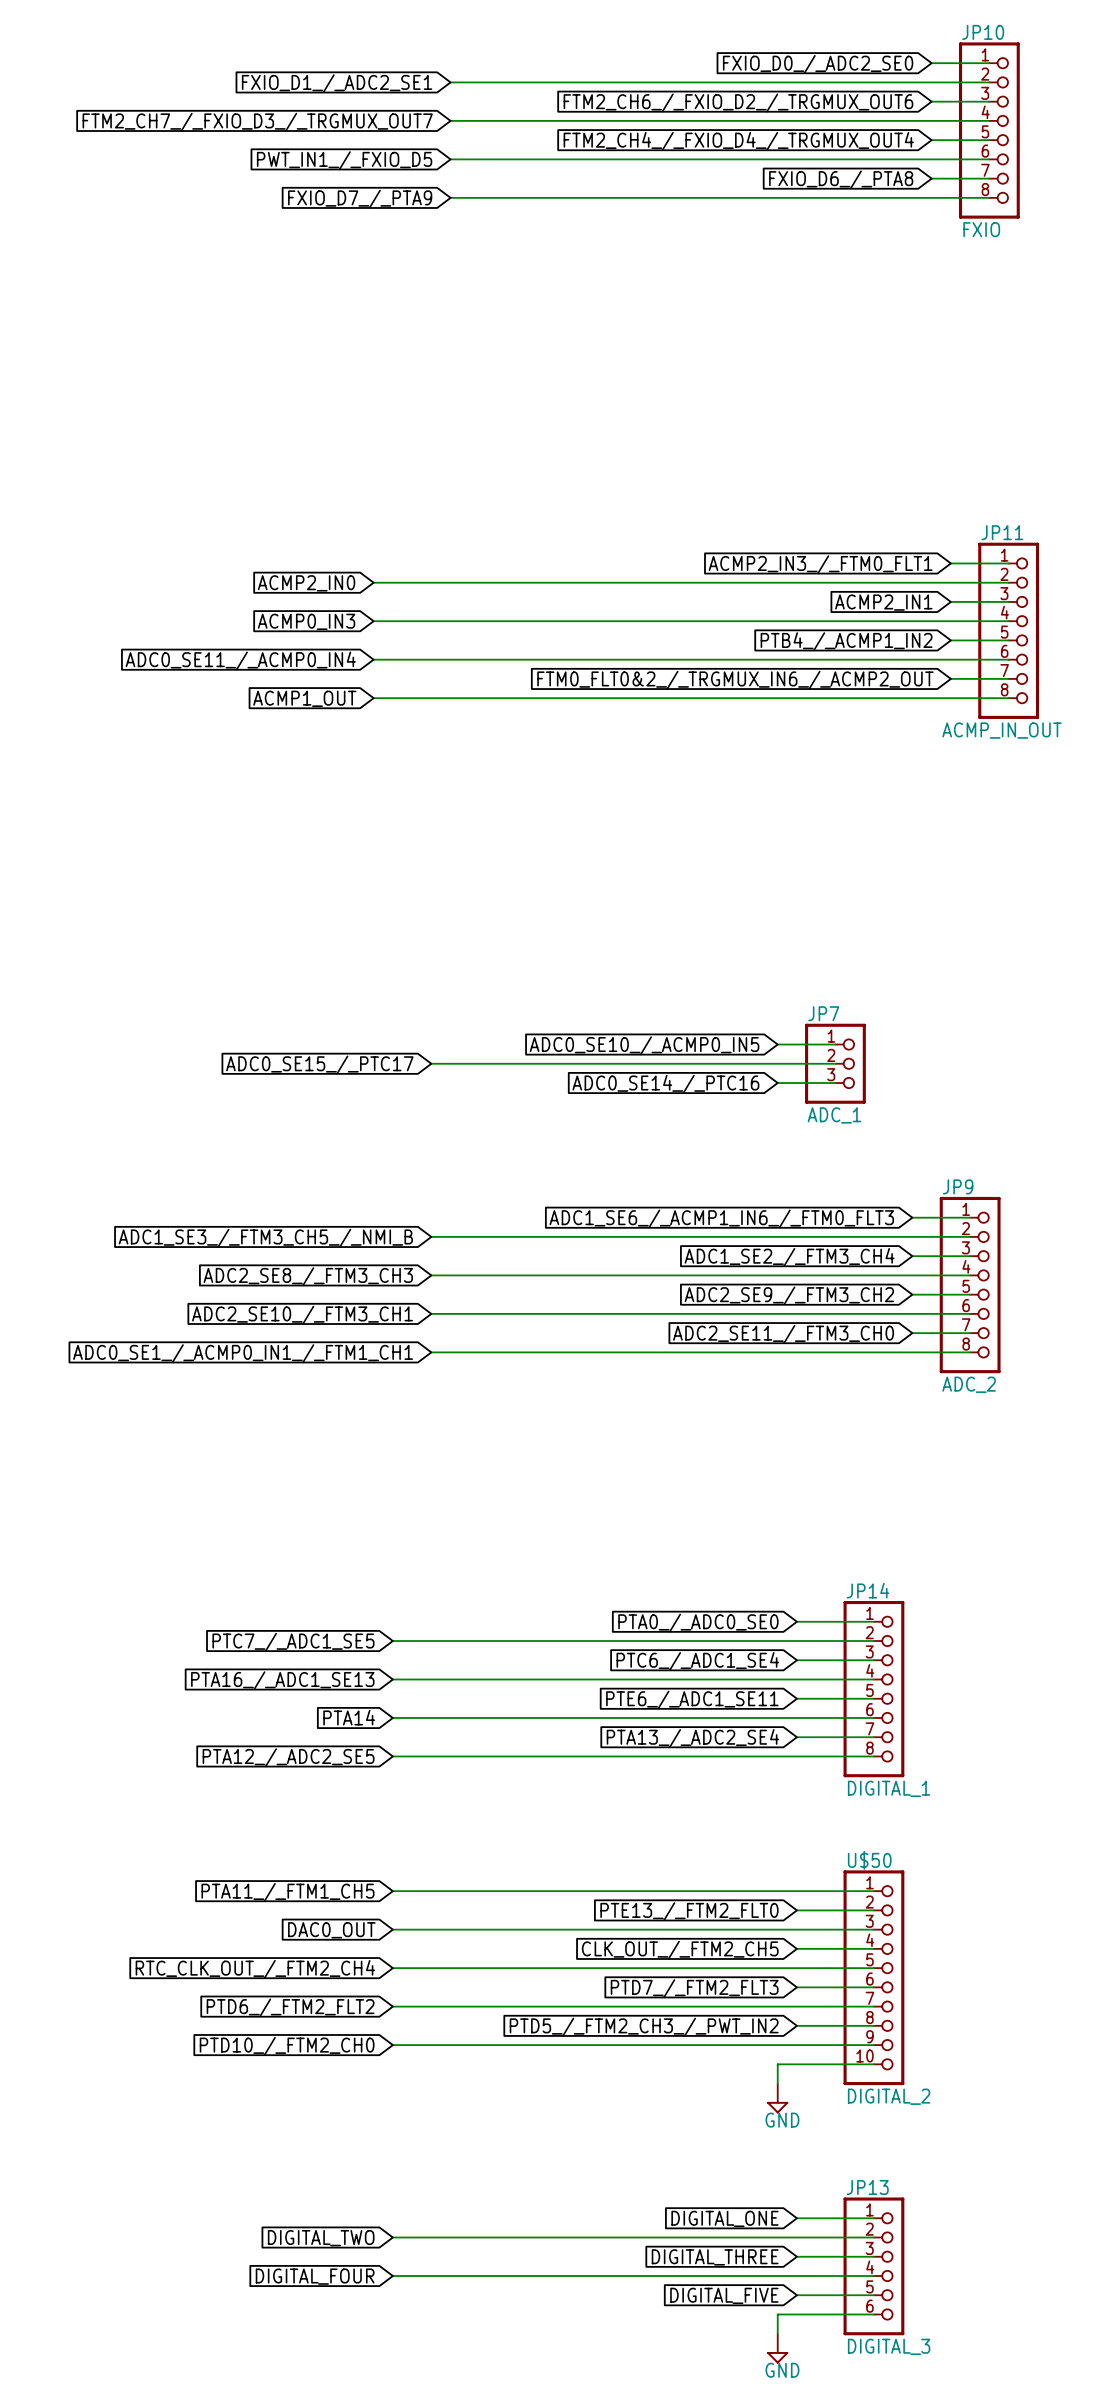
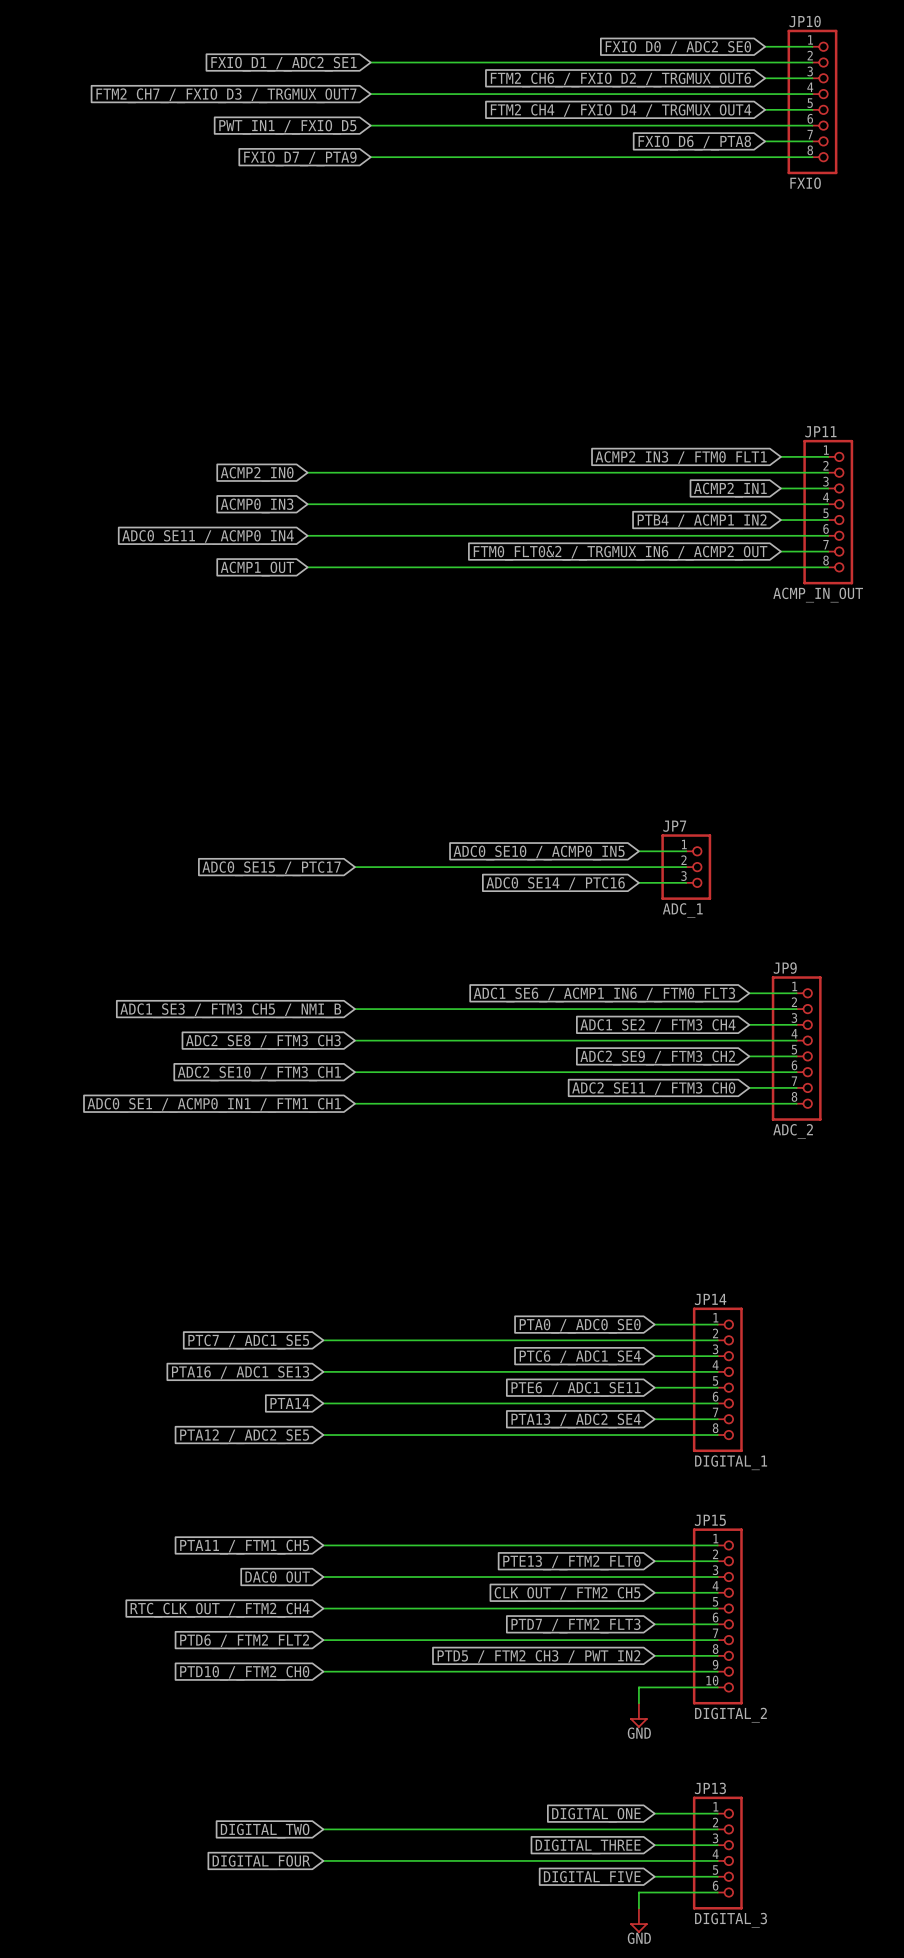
U$50 name: U$50 (869, 1860) -> JP15 (710, 1520)

